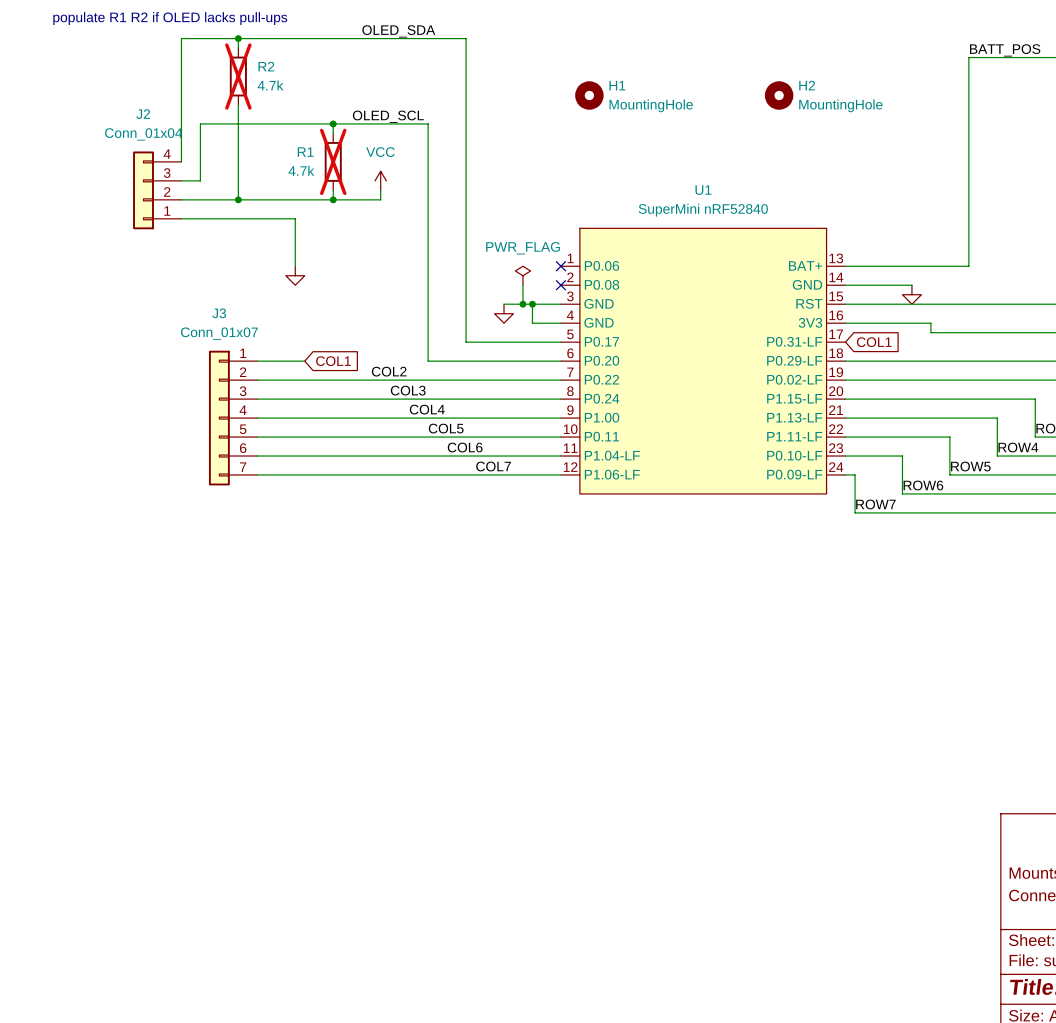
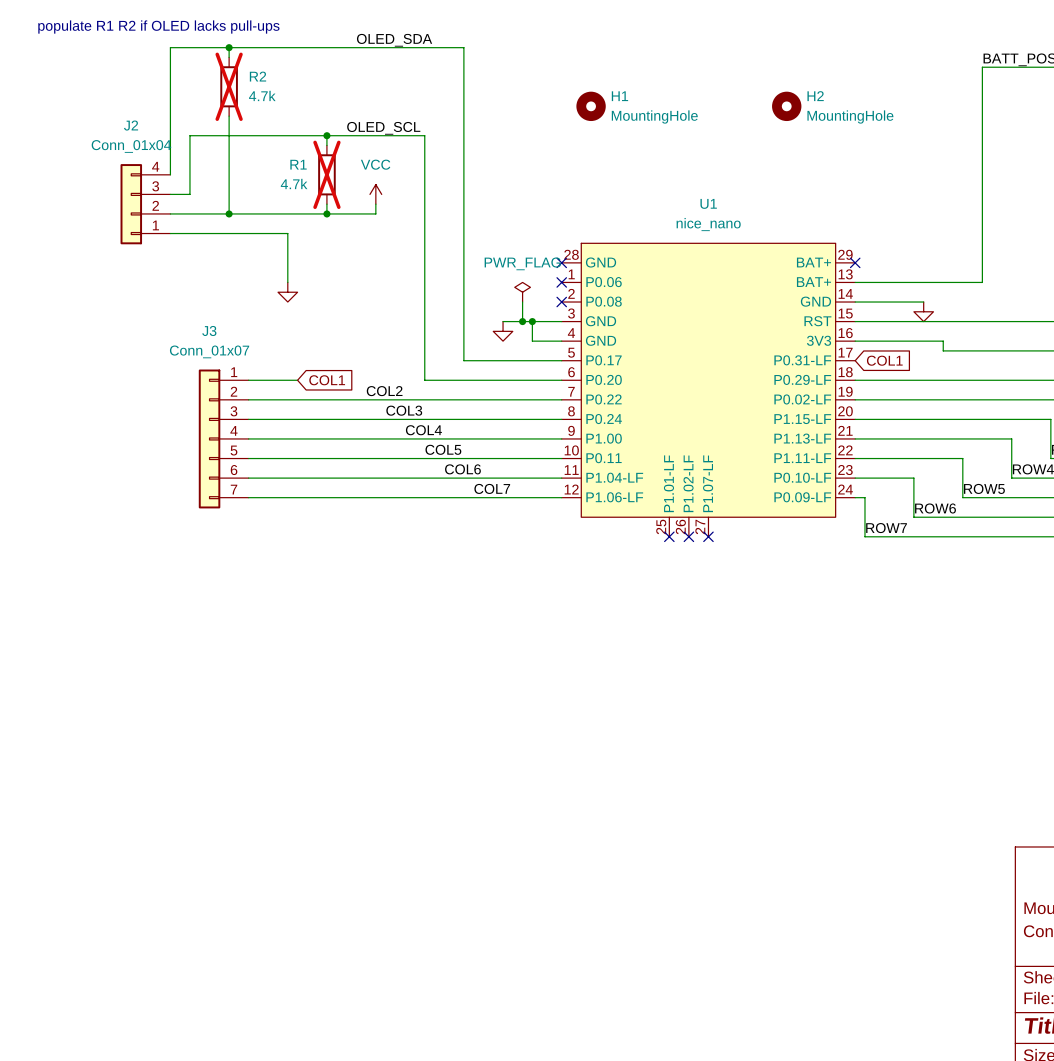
U1 value: SuperMini nRF52840 (703, 210) -> nice_nano (708, 224)
U1 symbol: [560, 228, 846, 494] -> [561, 243, 856, 537]
no-connect mark: none -> (561, 262)
no-connect mark: none -> (855, 262)
no-connect mark: none -> (669, 536)
no-connect mark: none -> (688, 536)
no-connect mark: none -> (708, 536)

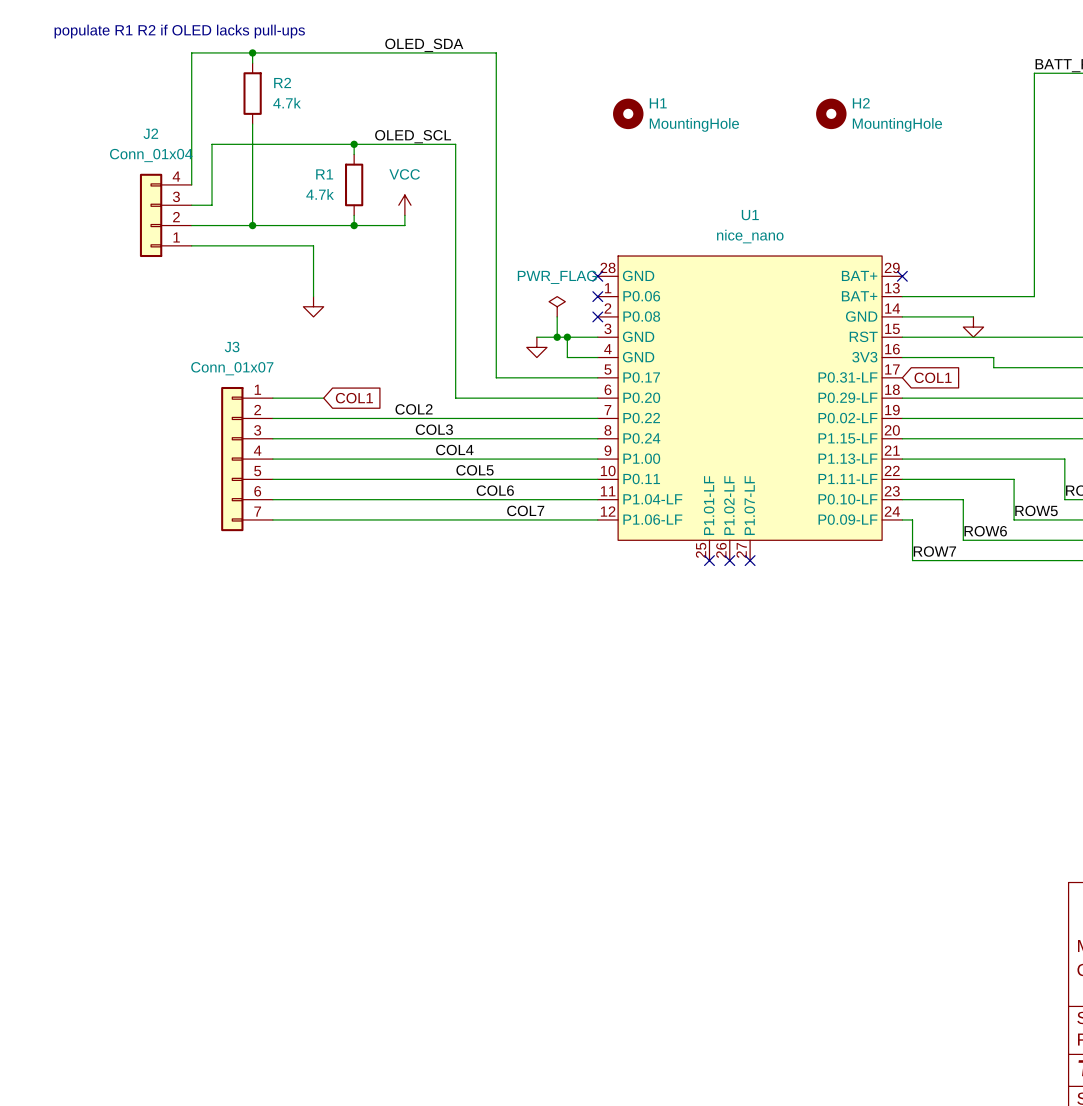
R2 do-not-place cross: (229, 86) -> none
R1 do-not-place cross: (326, 174) -> none

